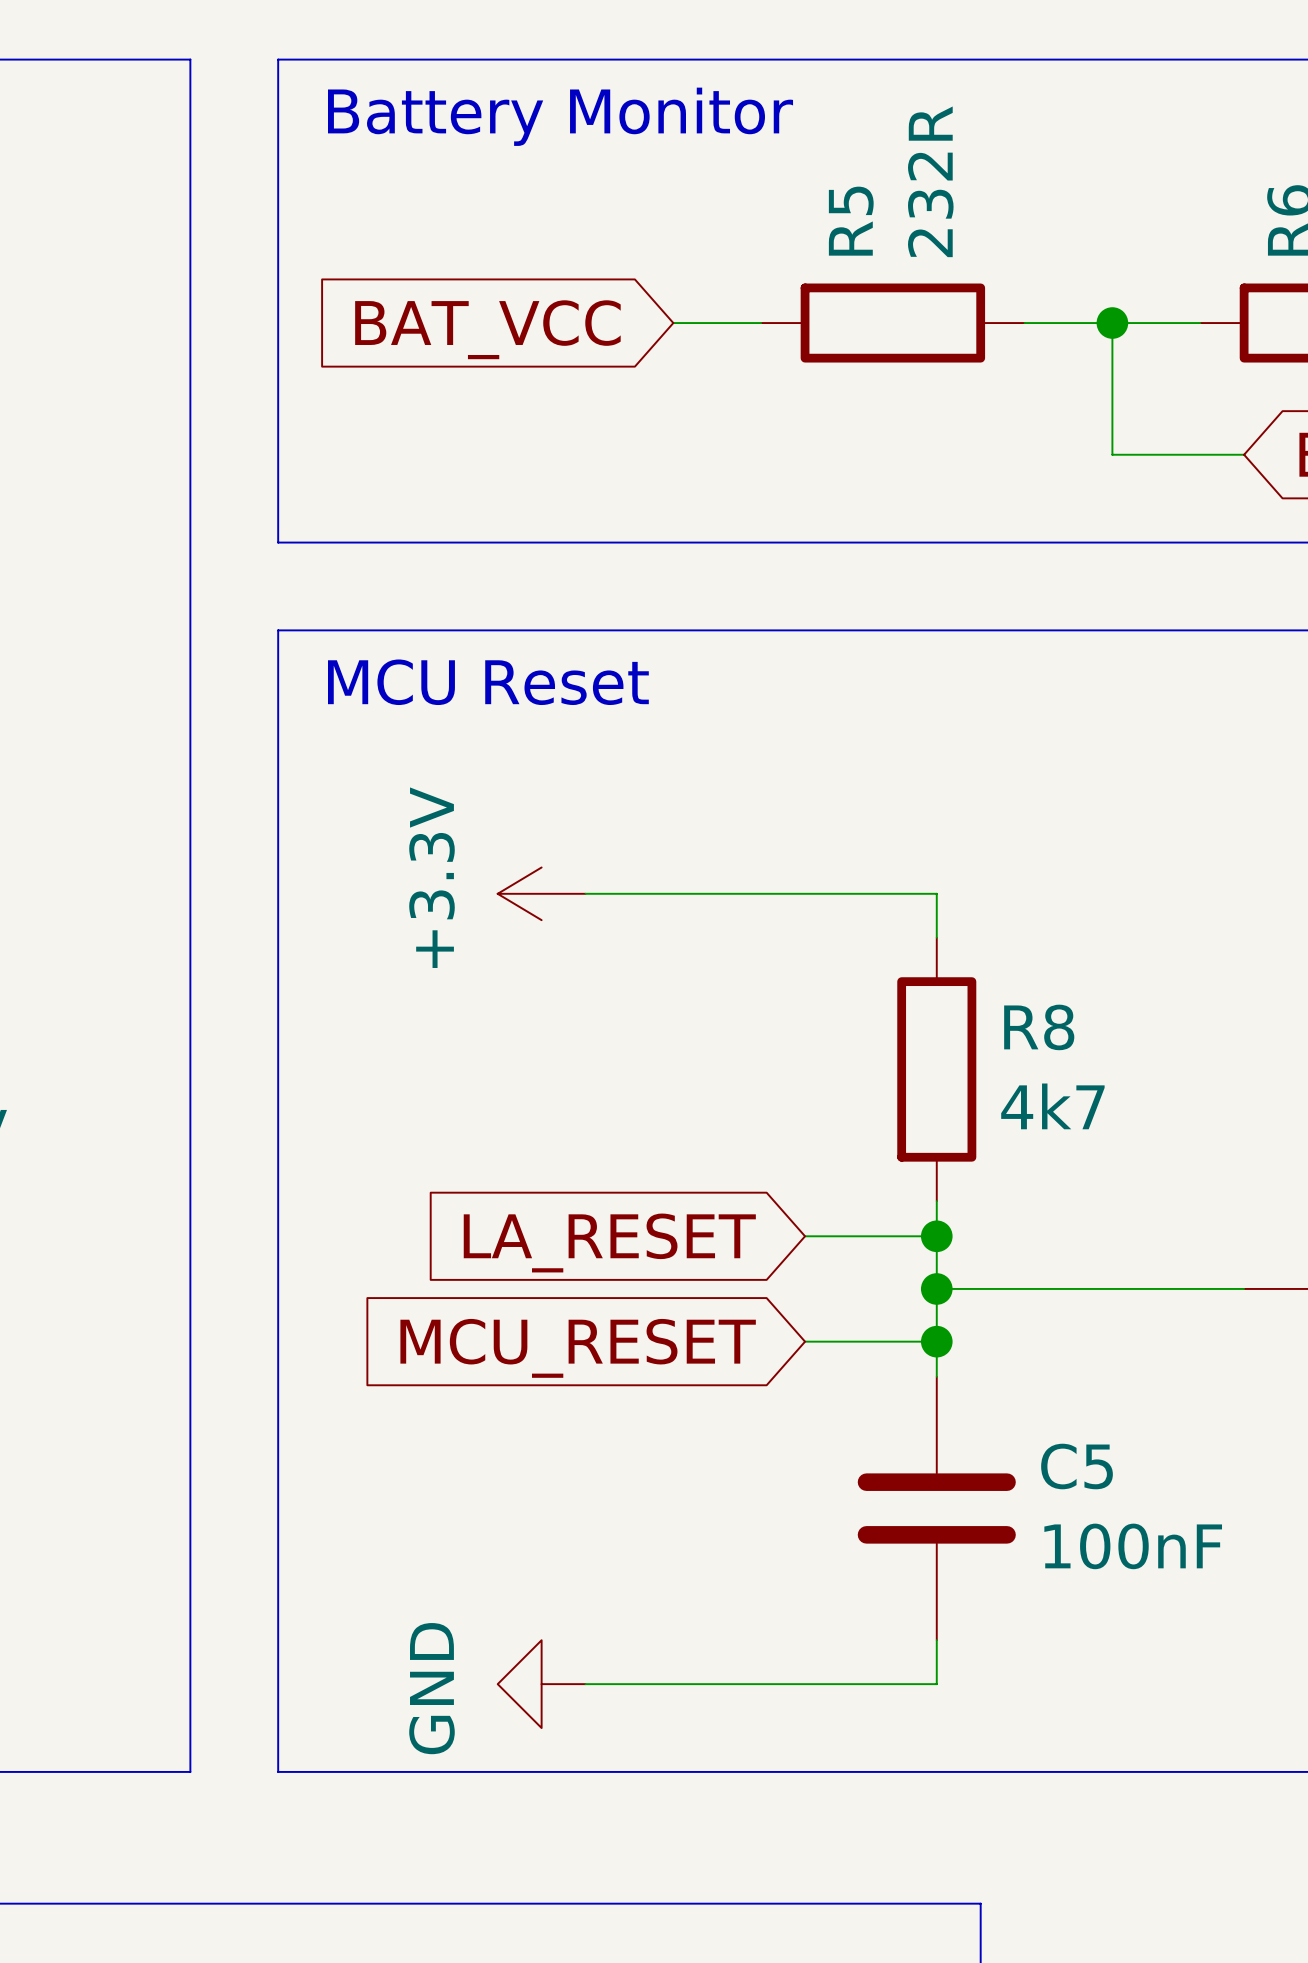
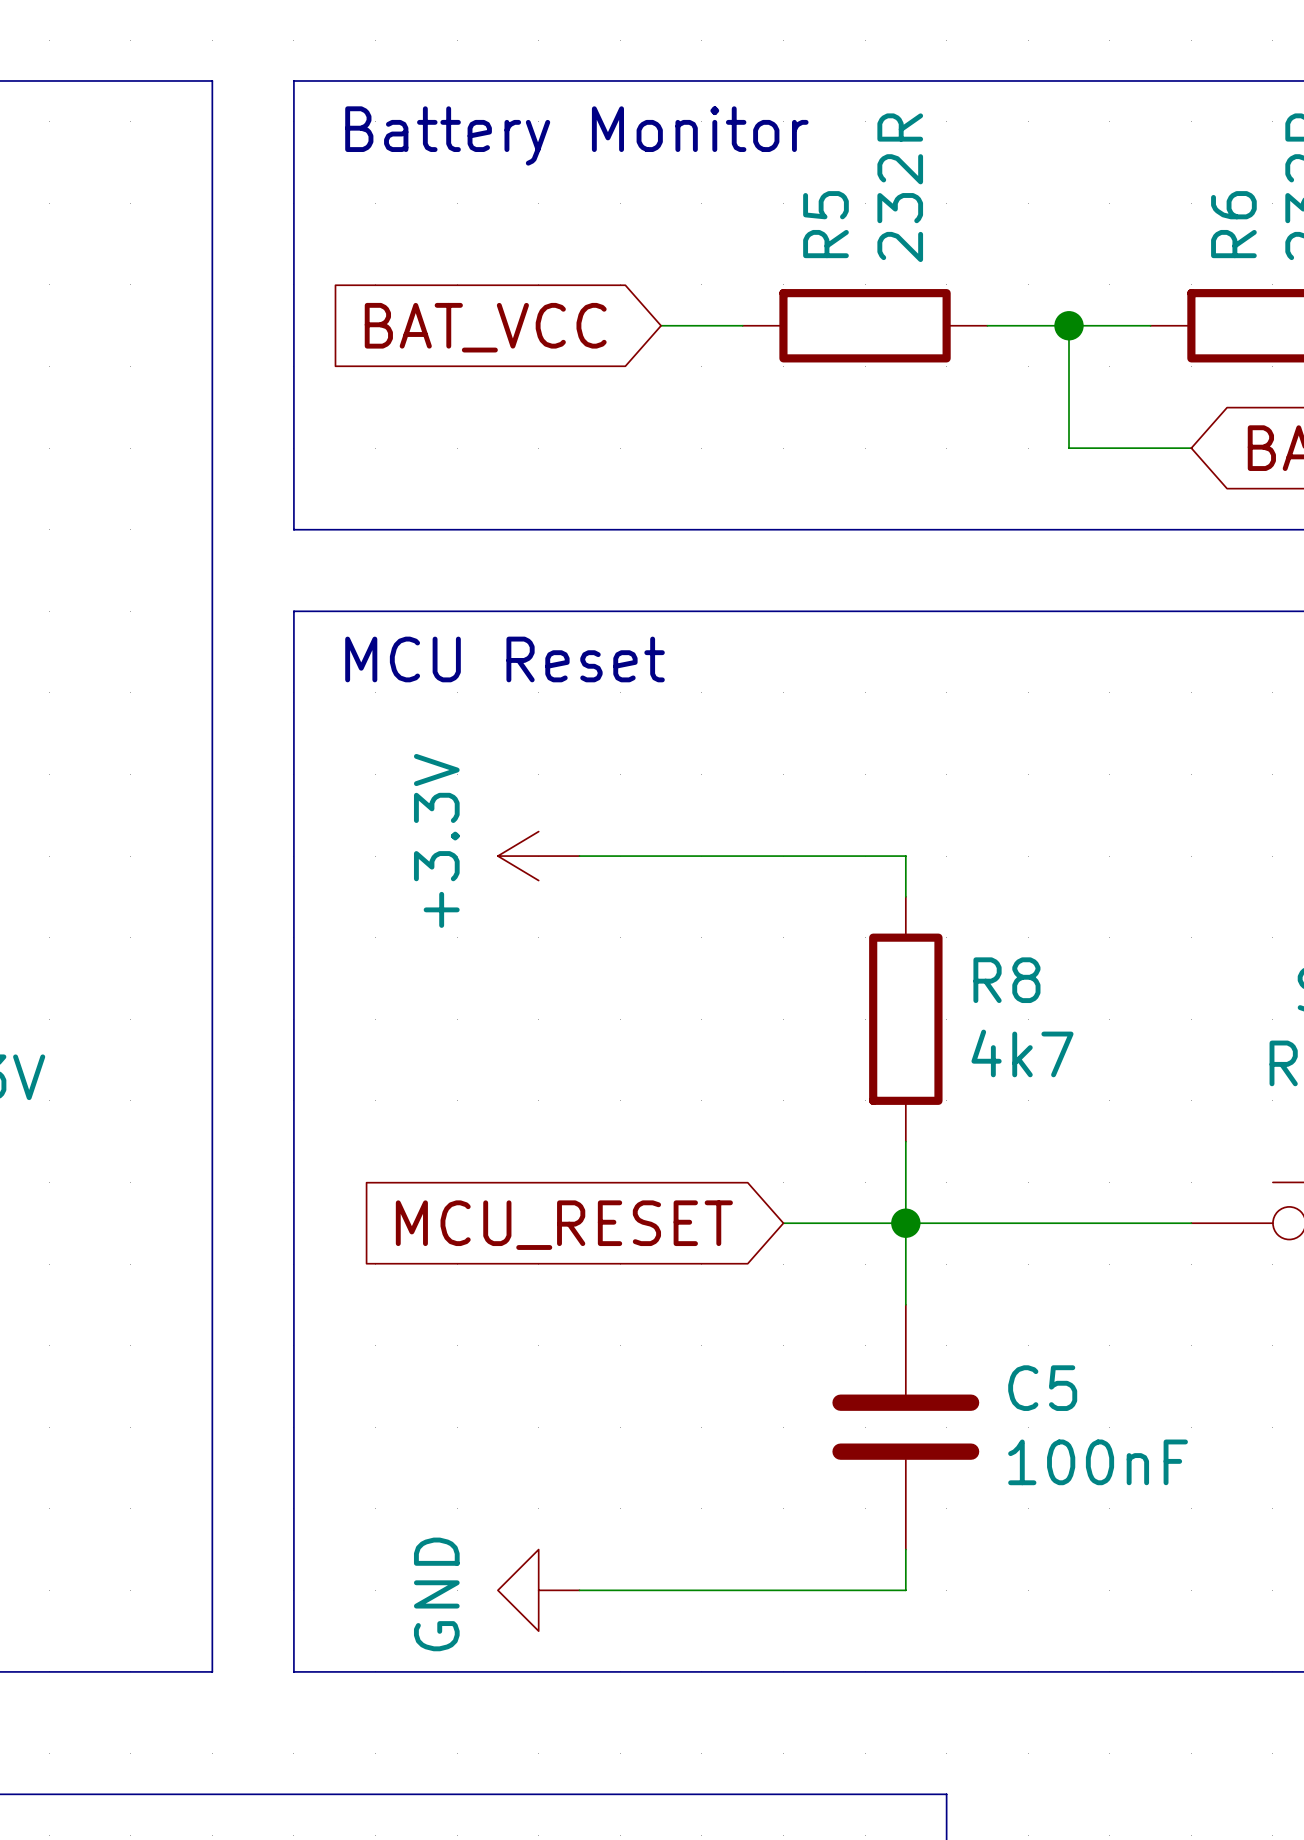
wire: (805, 1236) (936, 1236) -> (783, 1223) (905, 1223)
junction: (936, 1236) -> none
global label: LA_RESET (609, 1242) -> none
wire: (805, 1341) (936, 1341) -> none
junction: (936, 1341) -> none
global label position: MCU_RESET (578, 1348) -> MCU_RESET (564, 1225)

